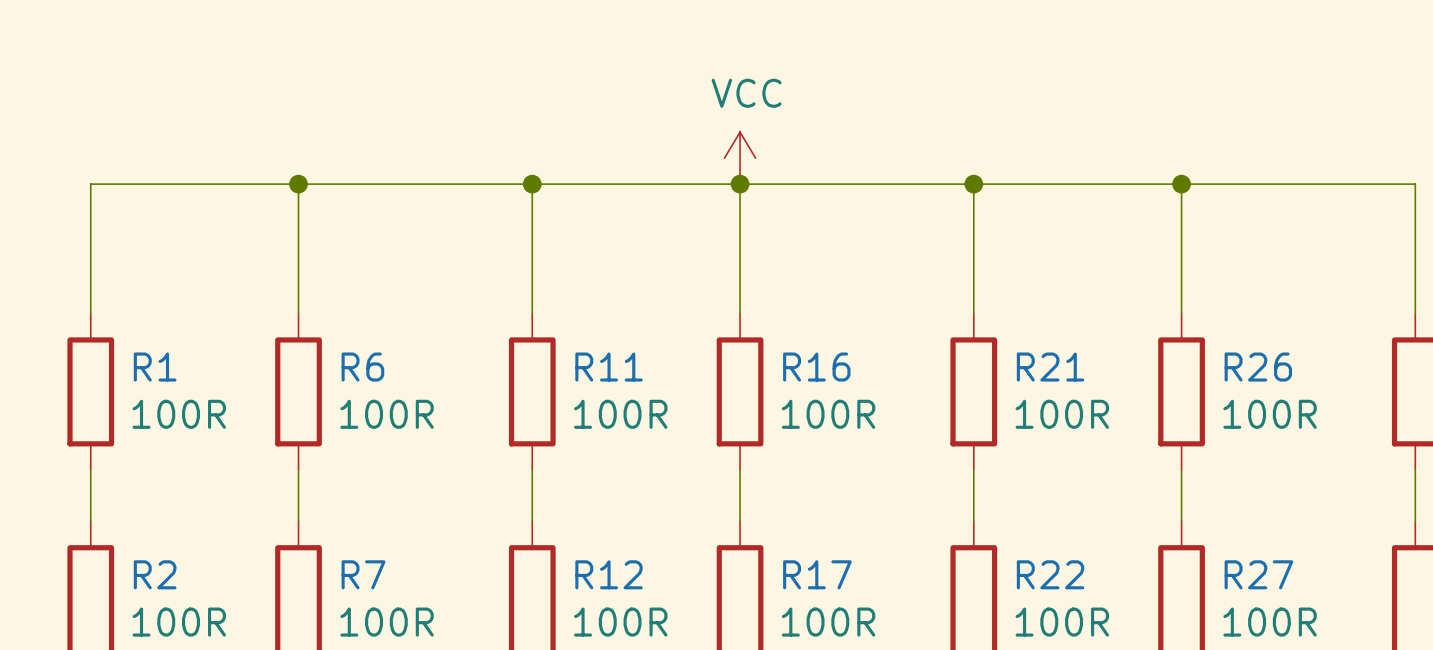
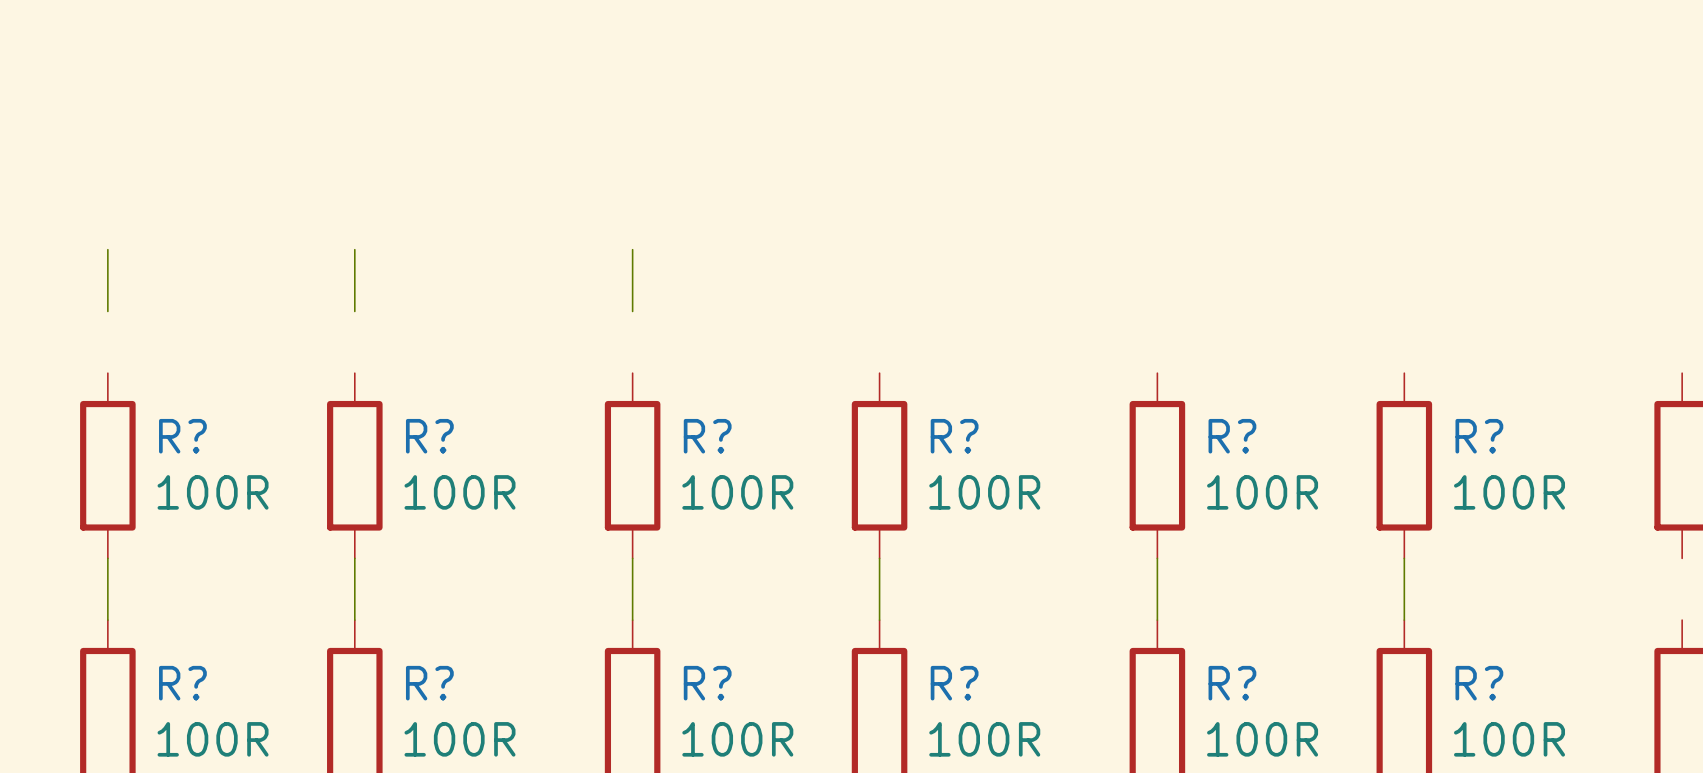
power symbol: VCC (740, 158) -> none
wire: (298, 184) (298, 210) -> none
junction: (298, 184) -> none
wire: (532, 184) (532, 210) -> none
junction: (532, 184) -> none
wire: (740, 184) (740, 313) -> none
junction: (740, 184) -> none
wire: (973, 184) (973, 313) -> none
junction: (973, 184) -> none
wire: (1181, 184) (1181, 313) -> none
junction: (1181, 184) -> none
wire: (90, 210) (90, 184) (1415, 184) (1415, 313) -> none
wire: (90, 262) (90, 313) -> none
wire: (298, 262) (298, 313) -> none
wire: (532, 262) (532, 313) -> none
R1 name: R1 (155, 367) -> R? (182, 436)
R6 name: R6 (362, 367) -> R? (429, 436)
R11 name: R11 (609, 367) -> R? (707, 436)
R16 name: R16 (816, 367) -> R? (954, 436)
R21 name: R21 (1050, 367) -> R? (1232, 436)
R26 name: R26 (1258, 367) -> R? (1479, 436)
wire: (1415, 469) (1415, 521) -> none
R2 name: R2 (155, 574) -> R? (182, 683)
R7 name: R7 (363, 574) -> R? (429, 683)
R12 name: R12 (609, 574) -> R? (707, 683)
R17 name: R17 (817, 574) -> R? (954, 683)
R22 name: R22 (1050, 574) -> R? (1232, 683)
R27 name: R27 (1258, 574) -> R? (1479, 683)

